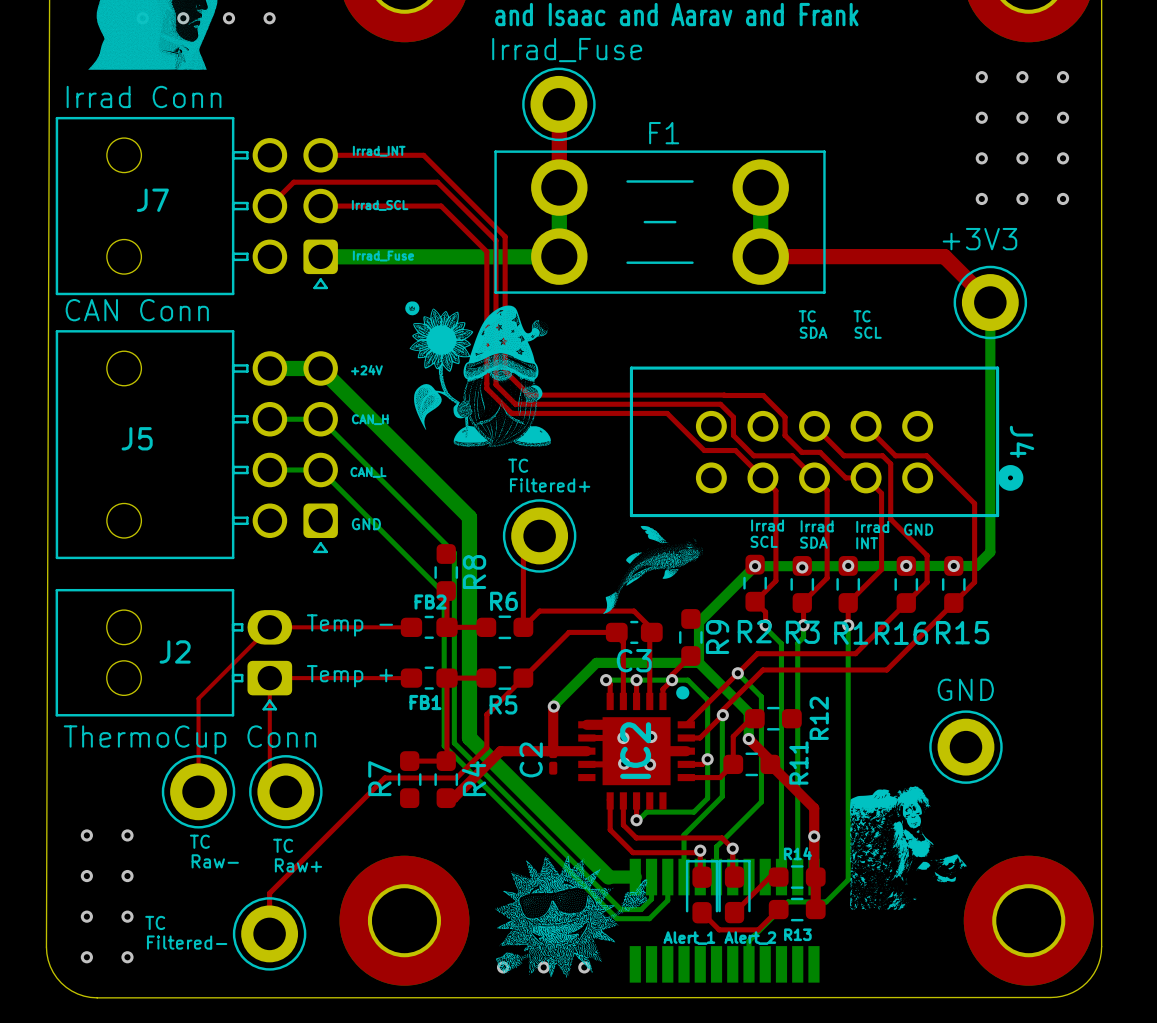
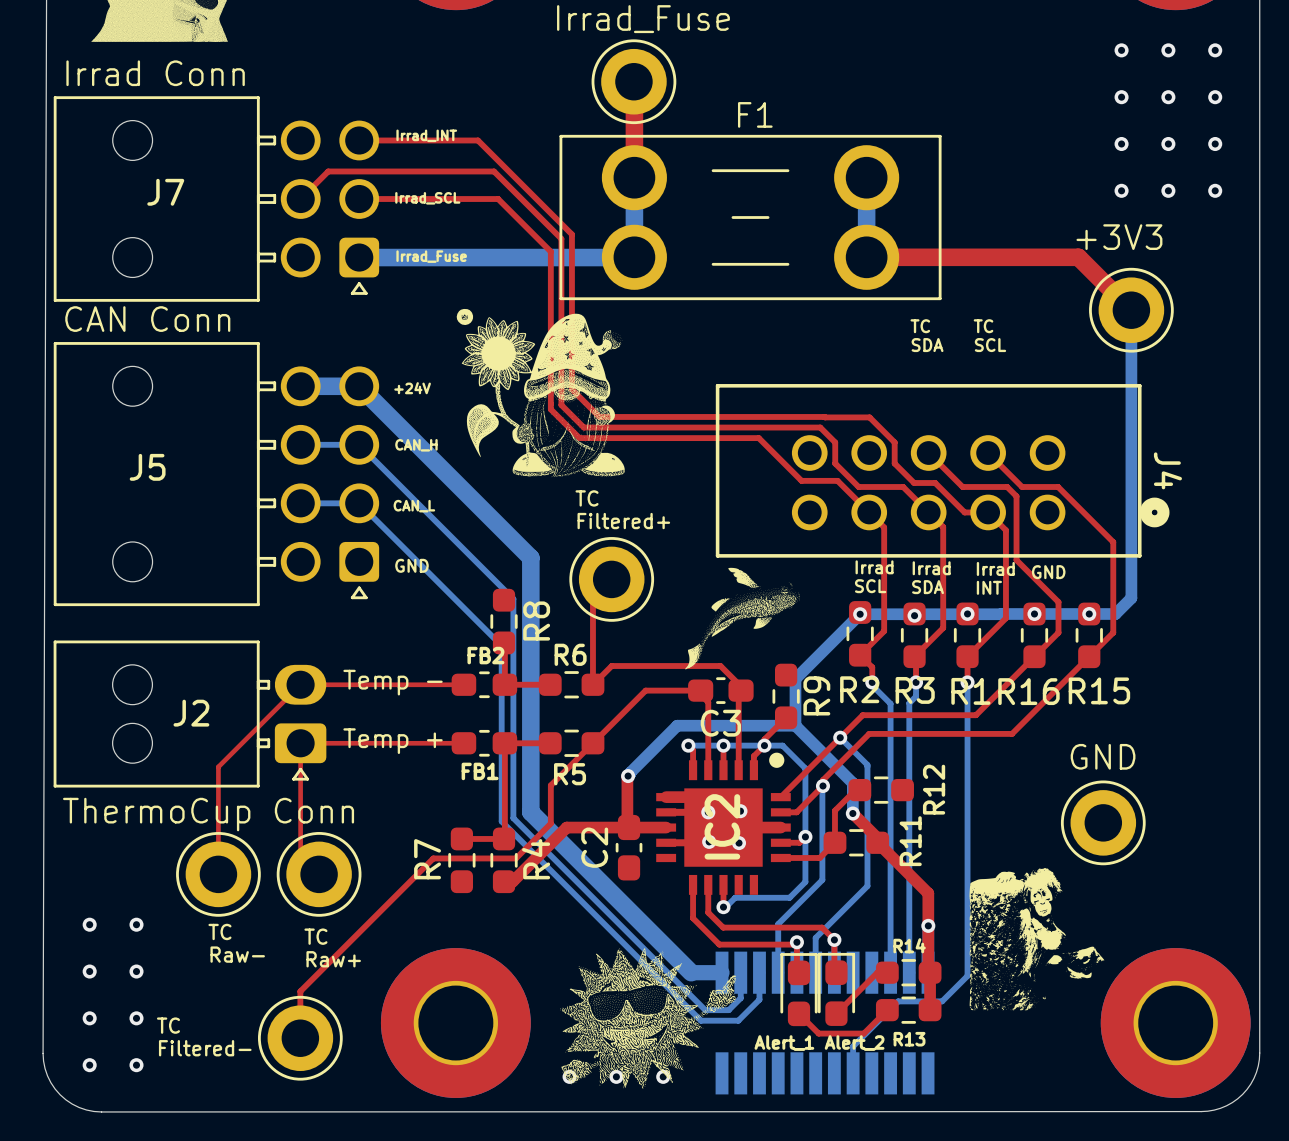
C2 footprint: [549, 745, 558, 775] -> [615, 814, 643, 881]

